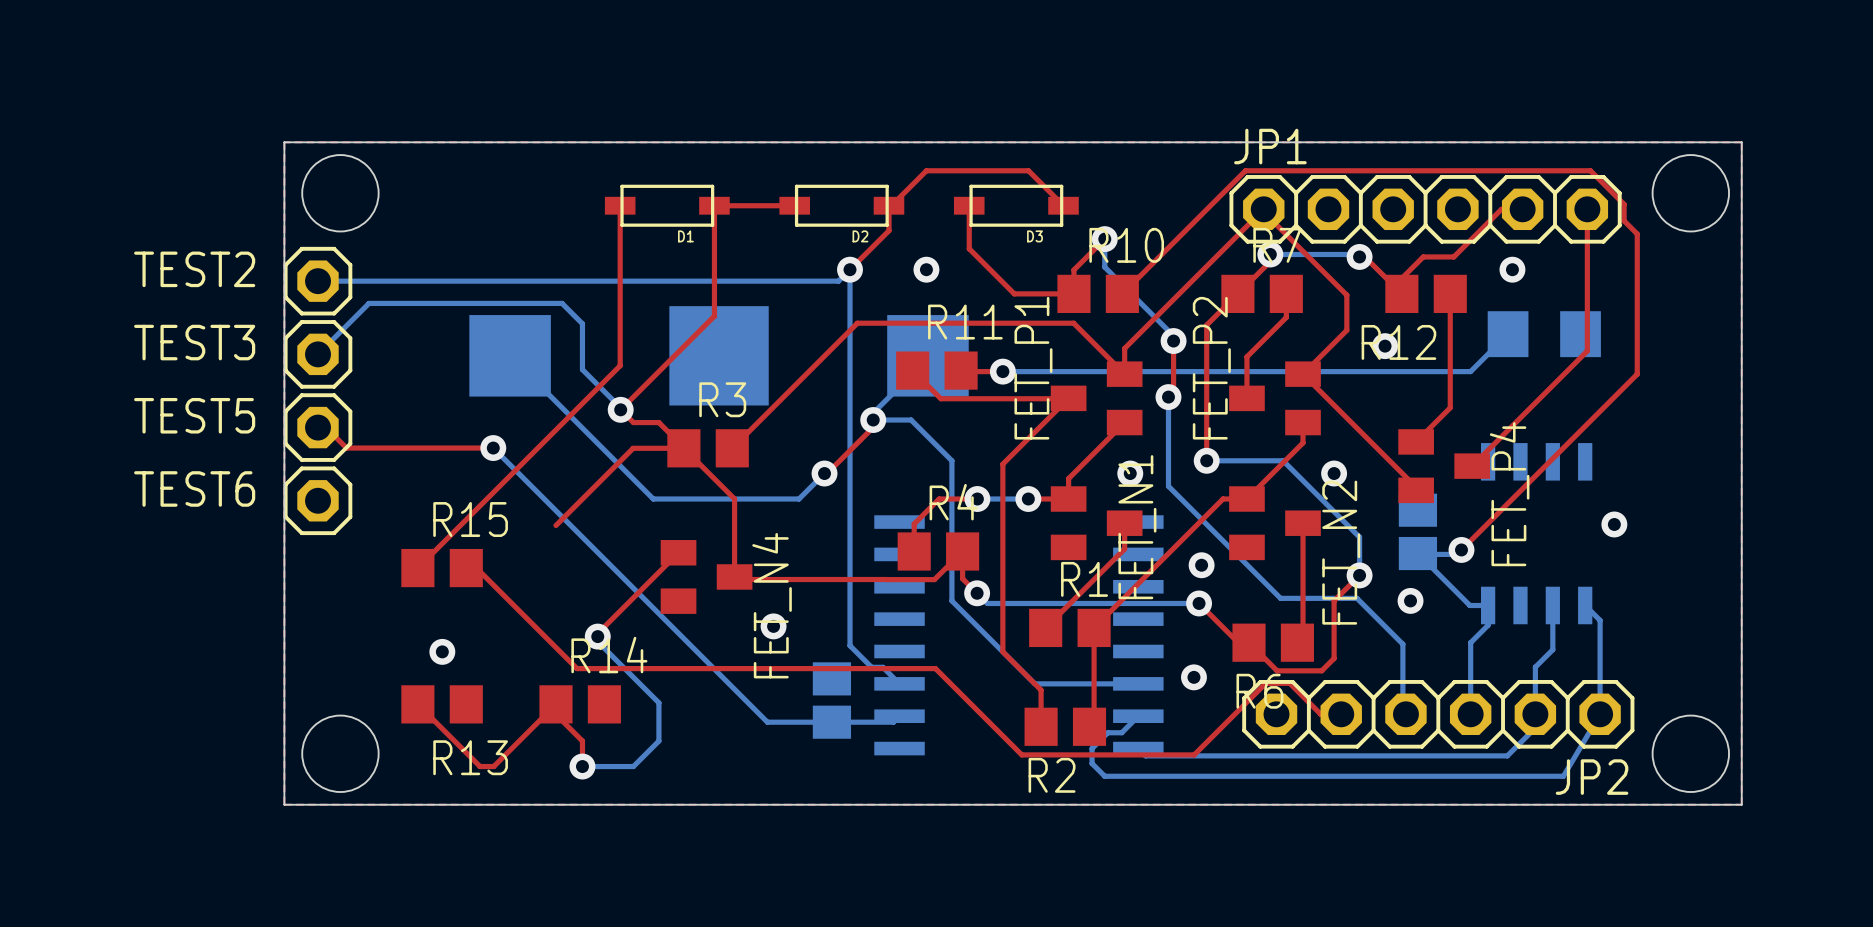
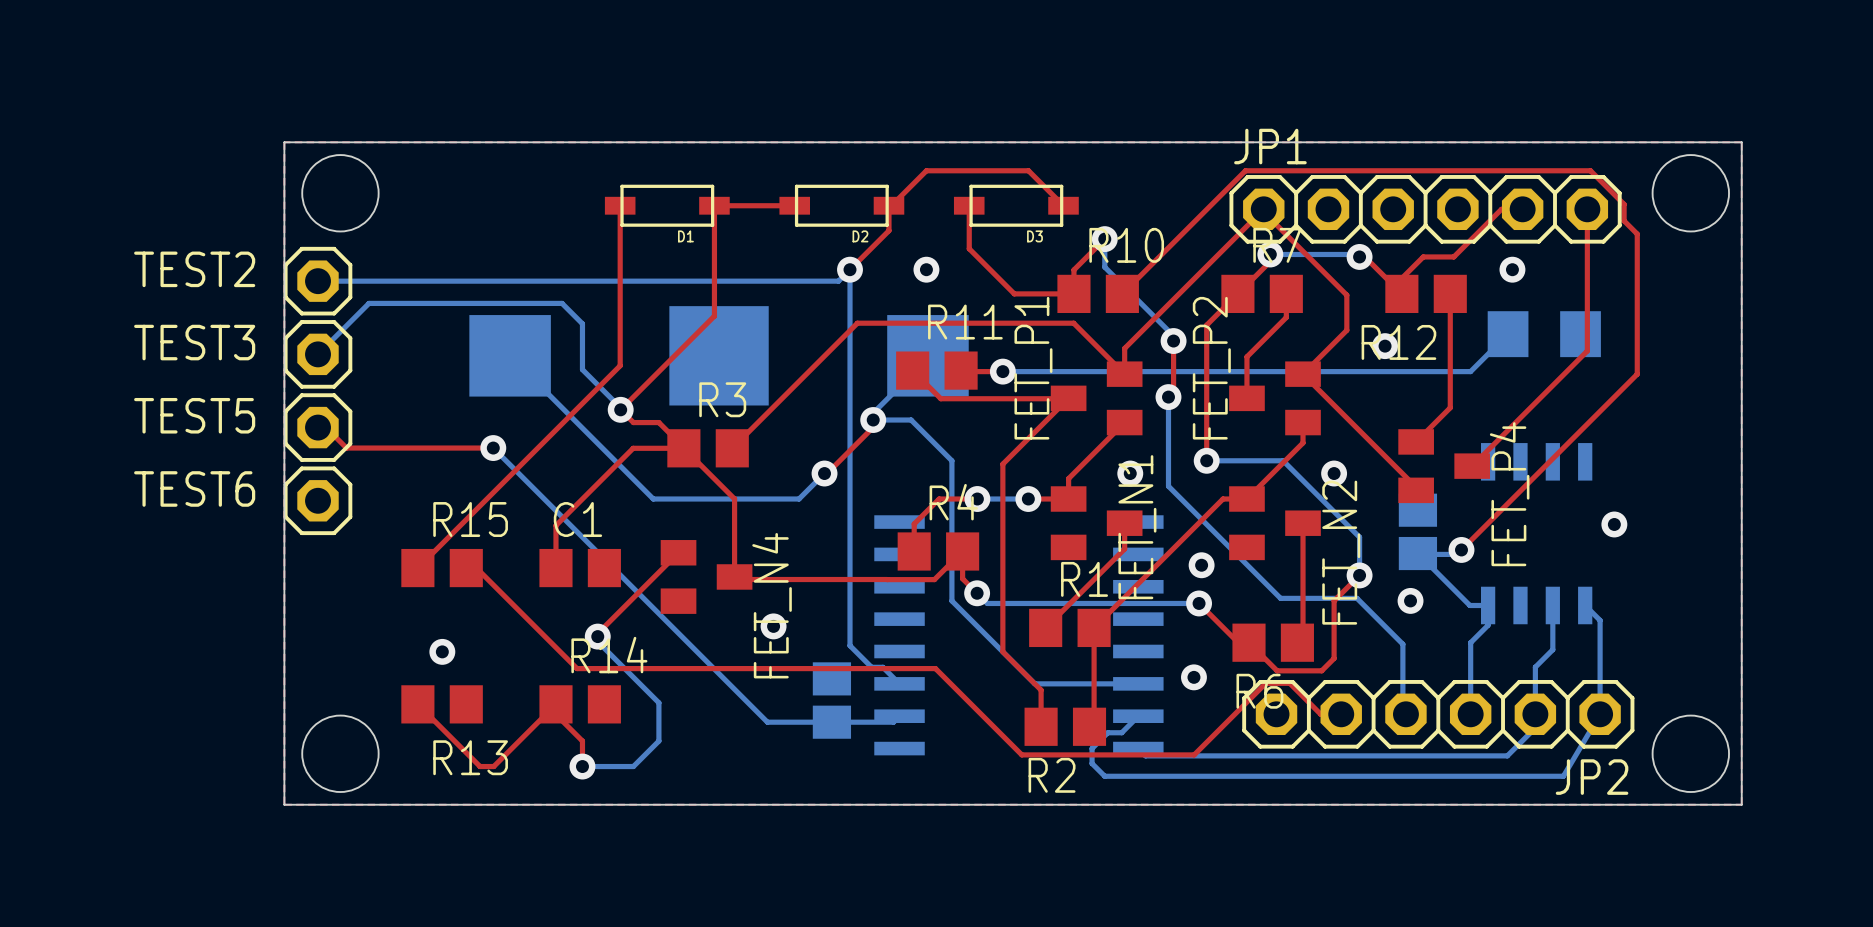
top track: none -> (555, 525) (555, 568)
C1: none -> (580, 568)

